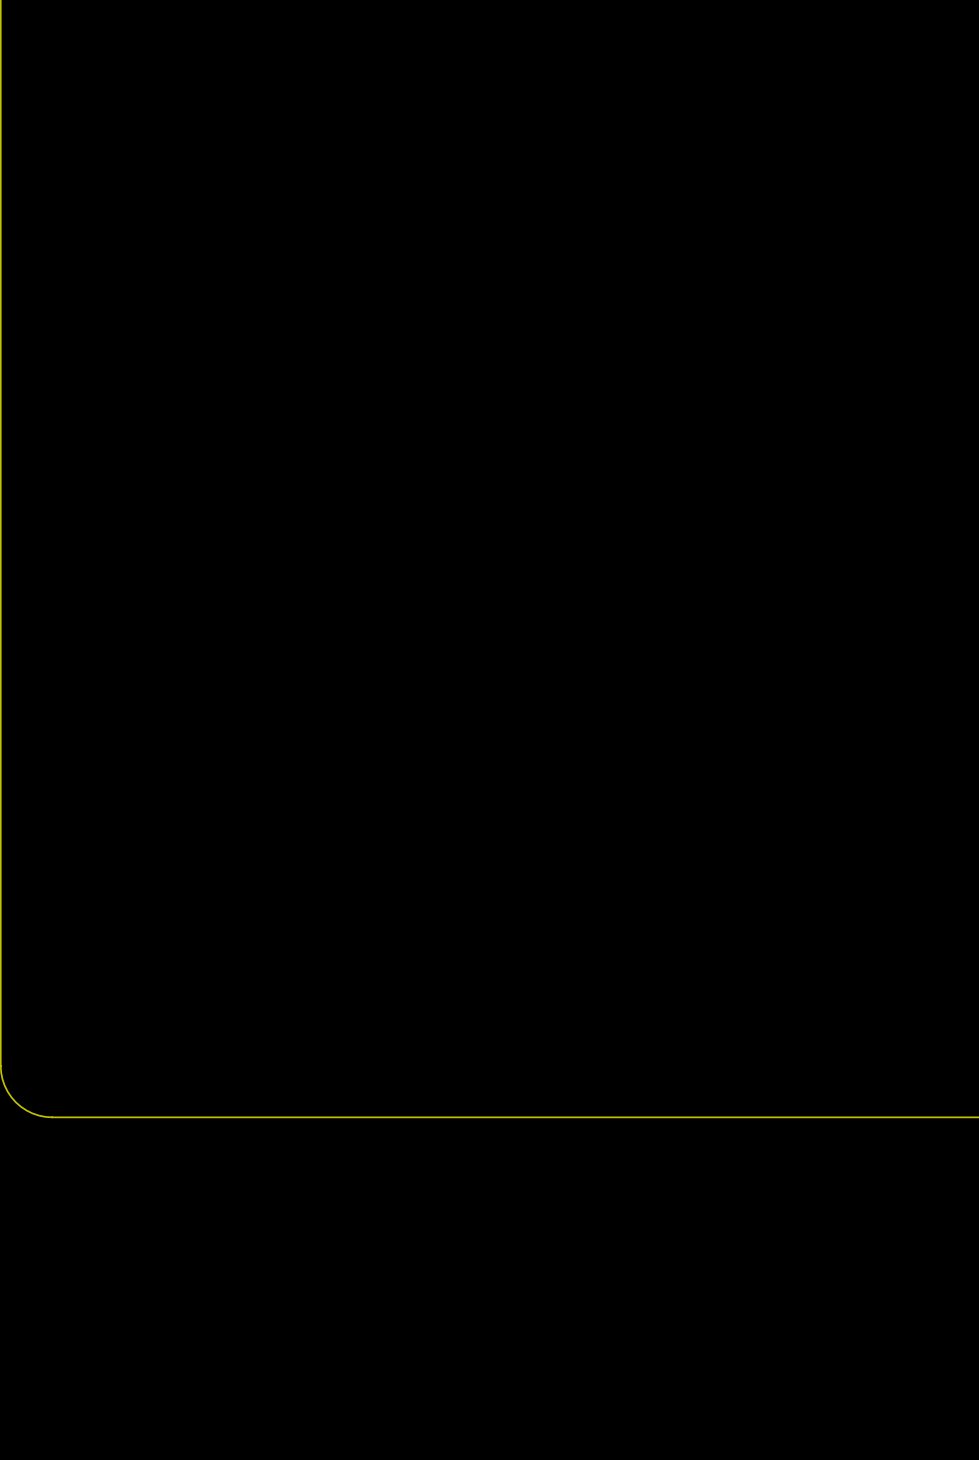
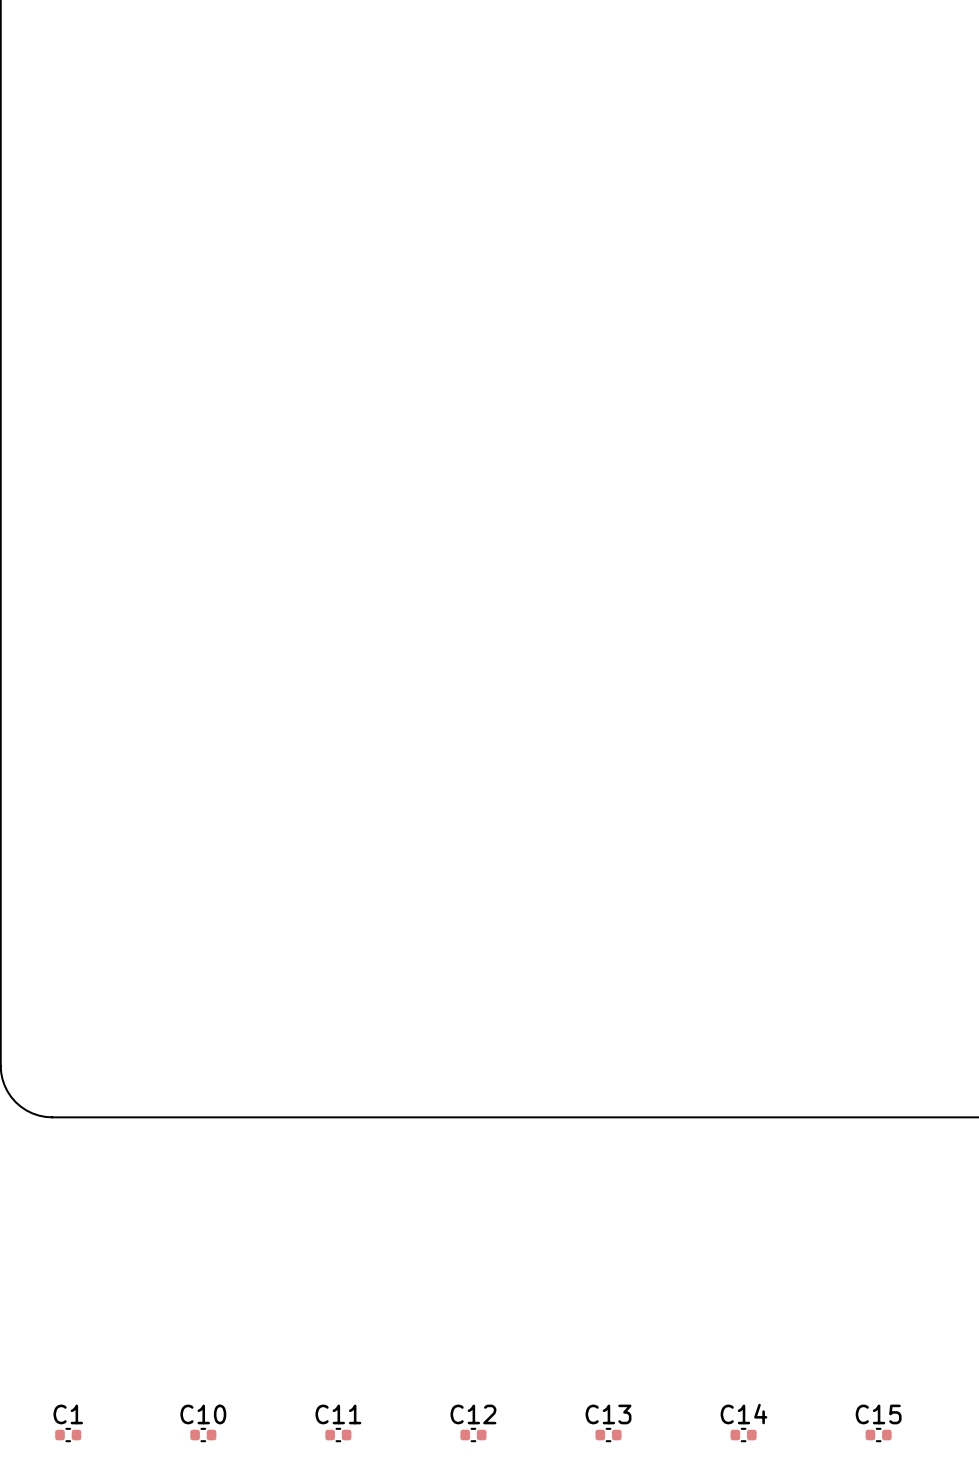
C1: none -> (68, 1435)
C10: none -> (203, 1435)
C11: none -> (338, 1435)
C12: none -> (473, 1435)
C13: none -> (608, 1435)
C14: none -> (743, 1435)
C15: none -> (878, 1435)

